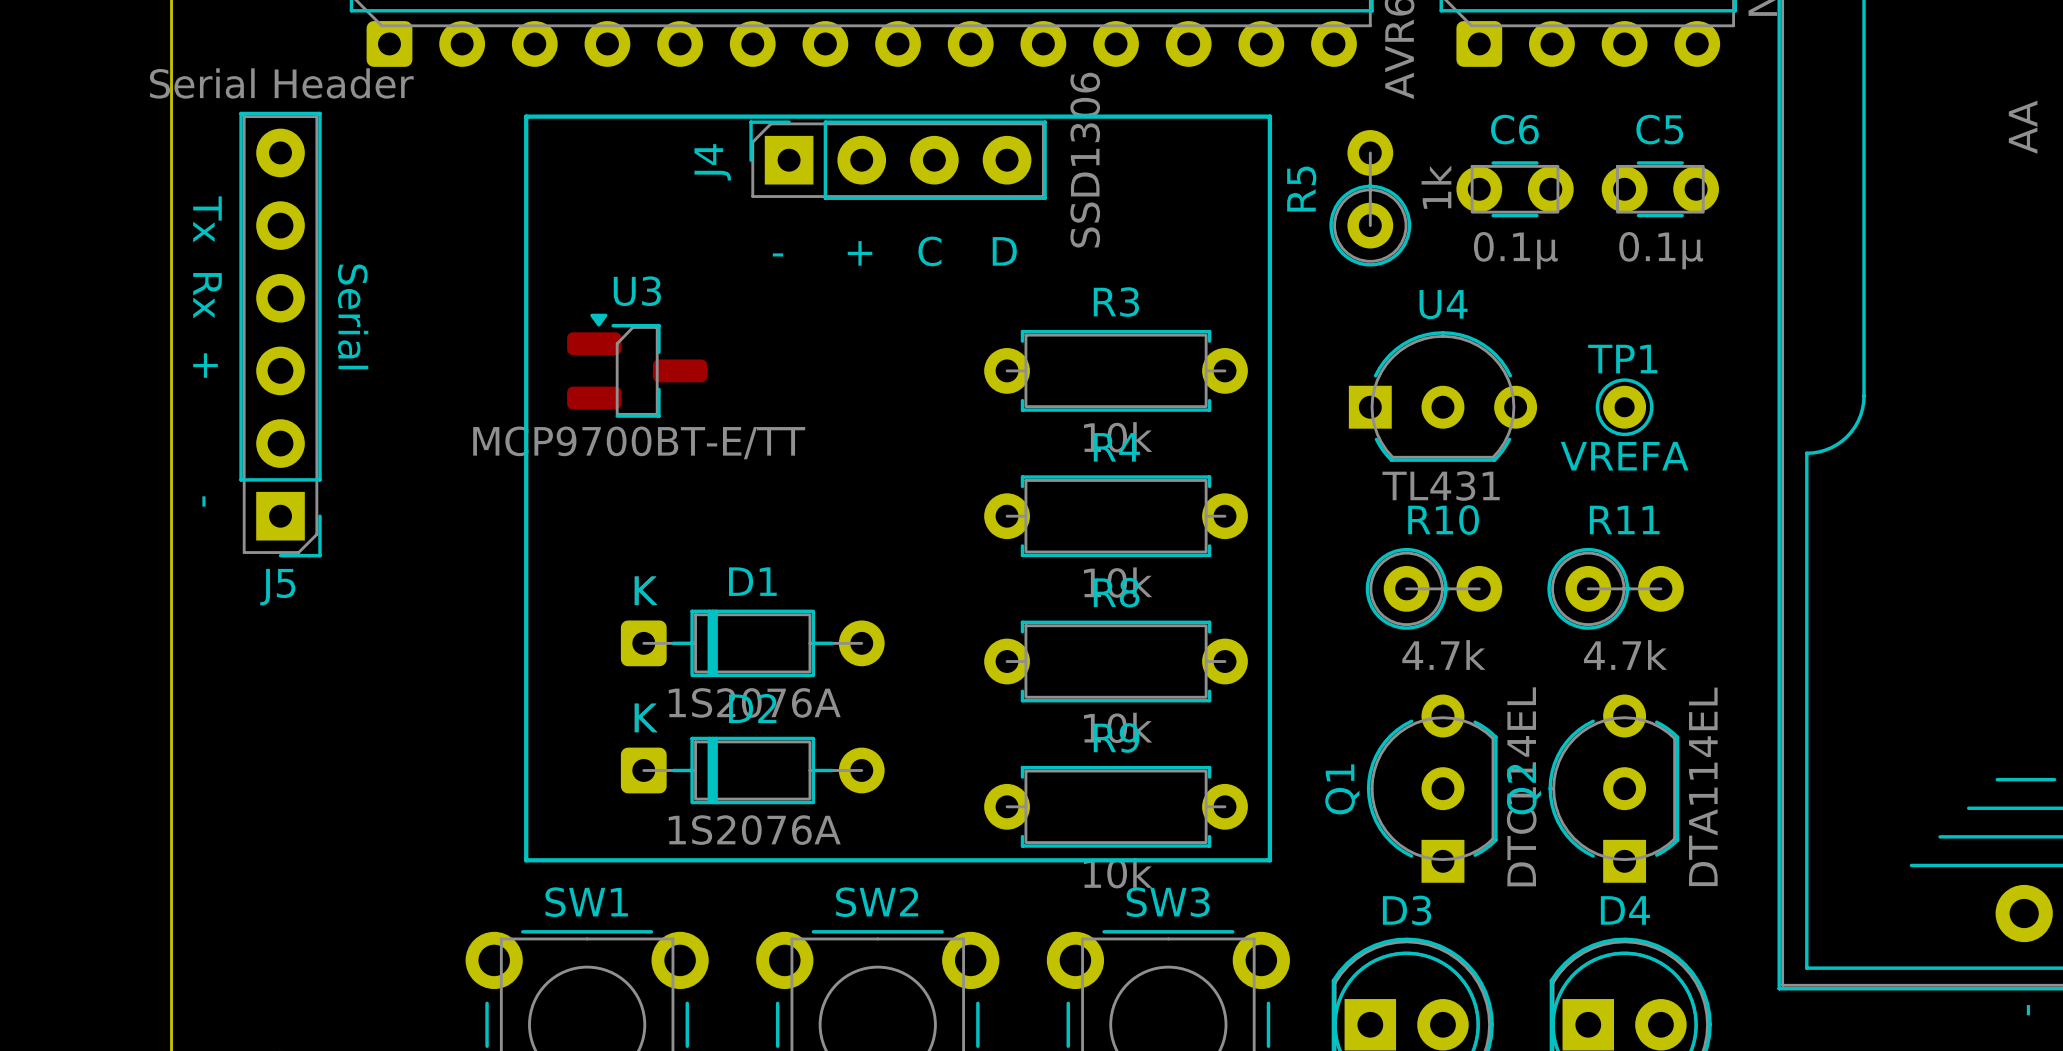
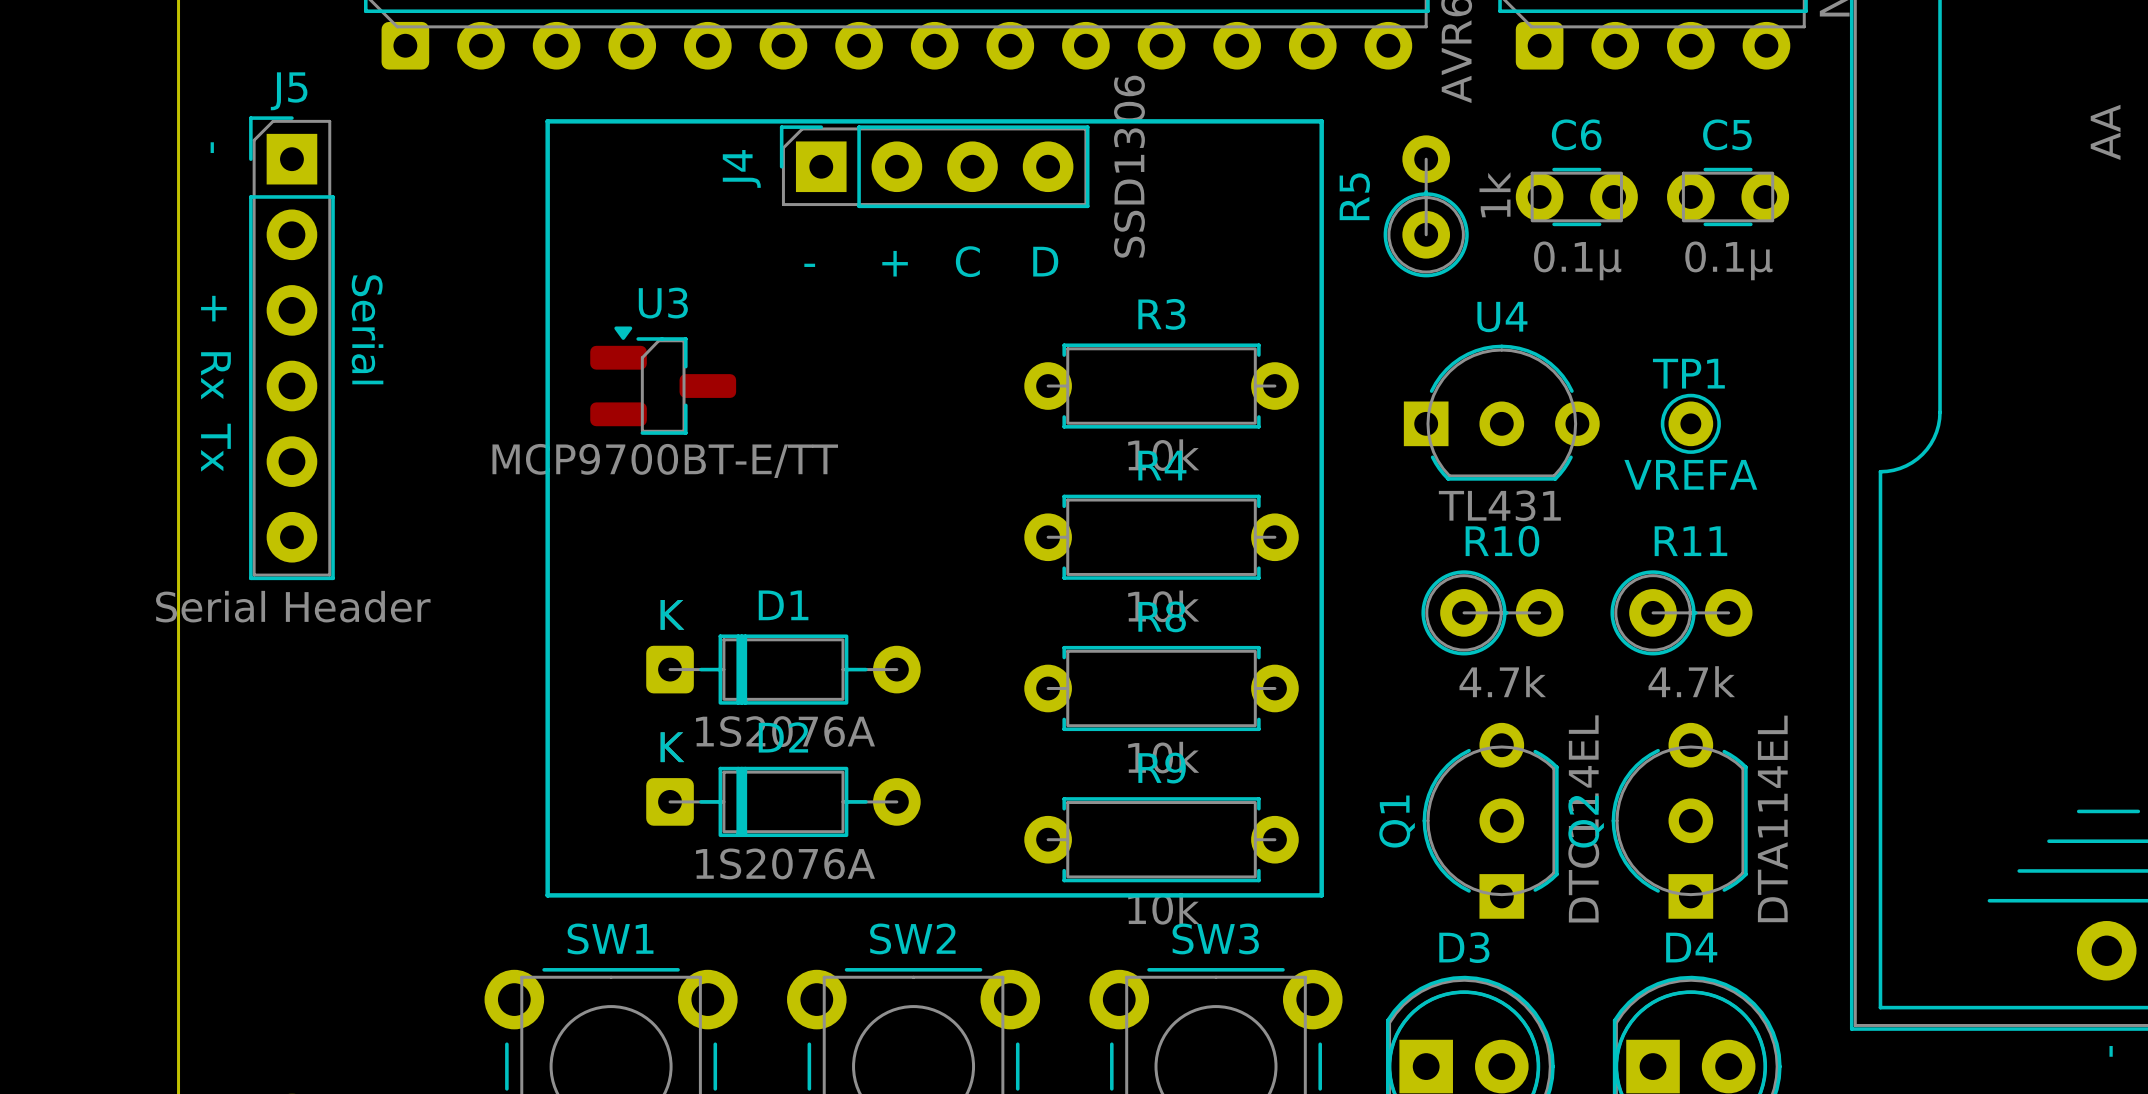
text position: Tx (207, 219) -> Tx (215, 447)
text: Rx (207, 295) -> + (213, 308)
J5 rotation: 0° (280, 334) -> 180° (291, 348)
text: + (205, 365) -> Rx (215, 375)
text position: - (203, 501) -> - (212, 147)

